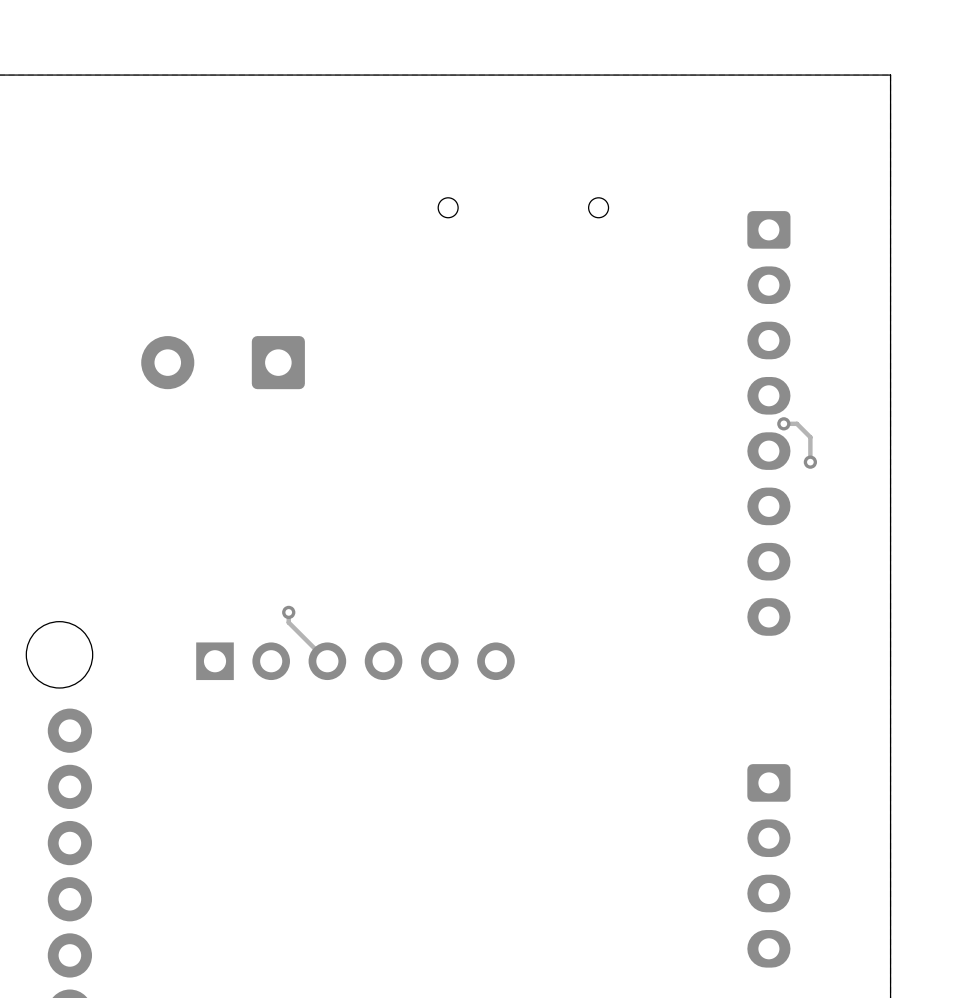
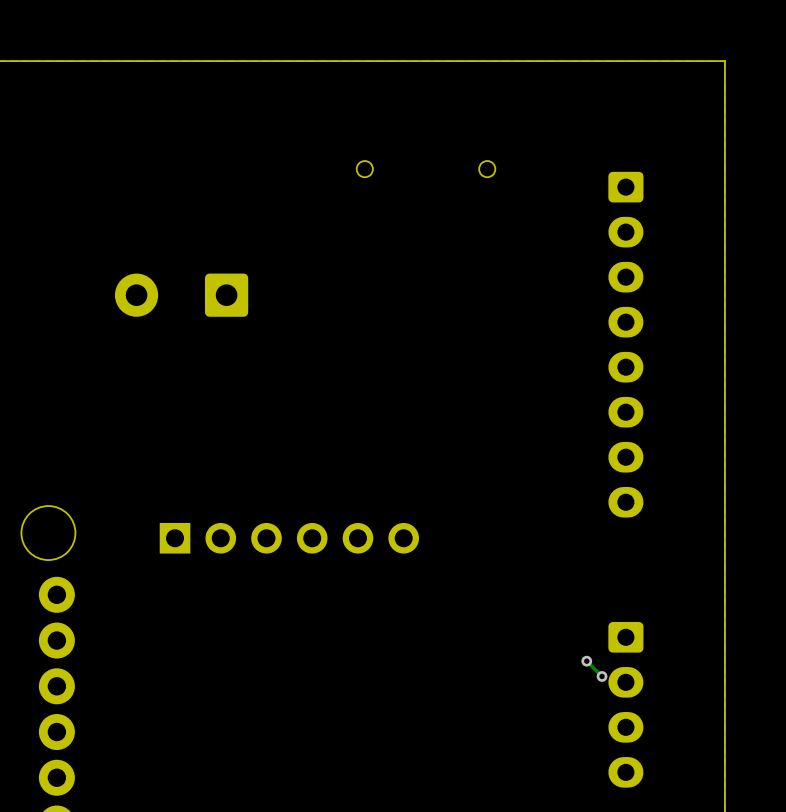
track: (783, 423) (796, 423) (810, 437) (810, 462) -> none
via: (783, 423) -> none
via: (810, 462) -> none
track: (288, 612) (288, 622) (327, 661) -> none
via: (288, 612) -> none
track: none -> (586, 661) (602, 676)
via: none -> (586, 661)
via: none -> (602, 676)

